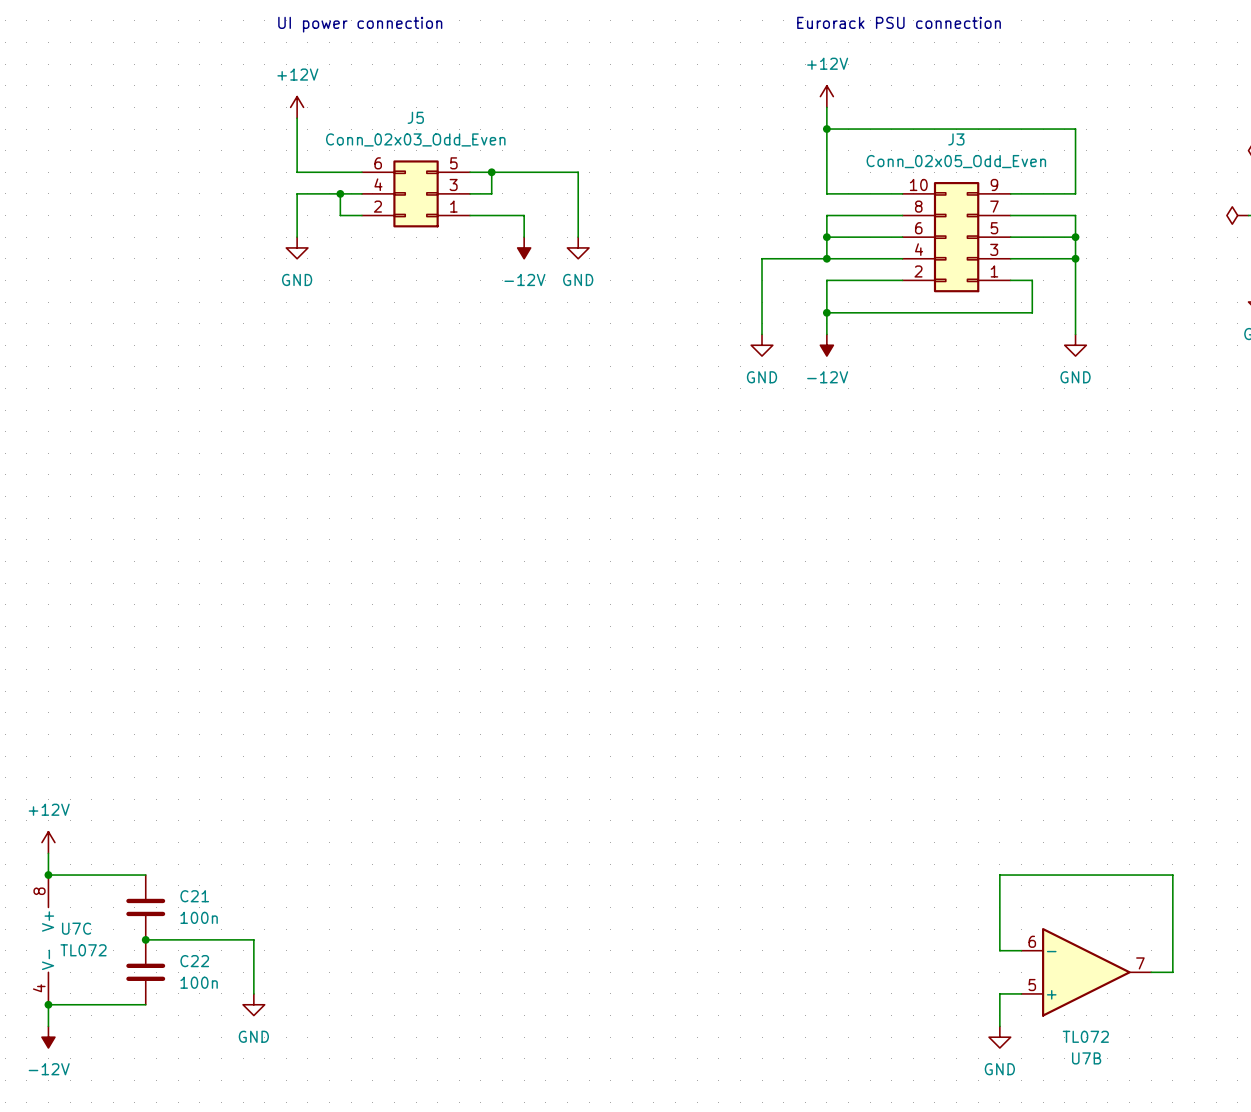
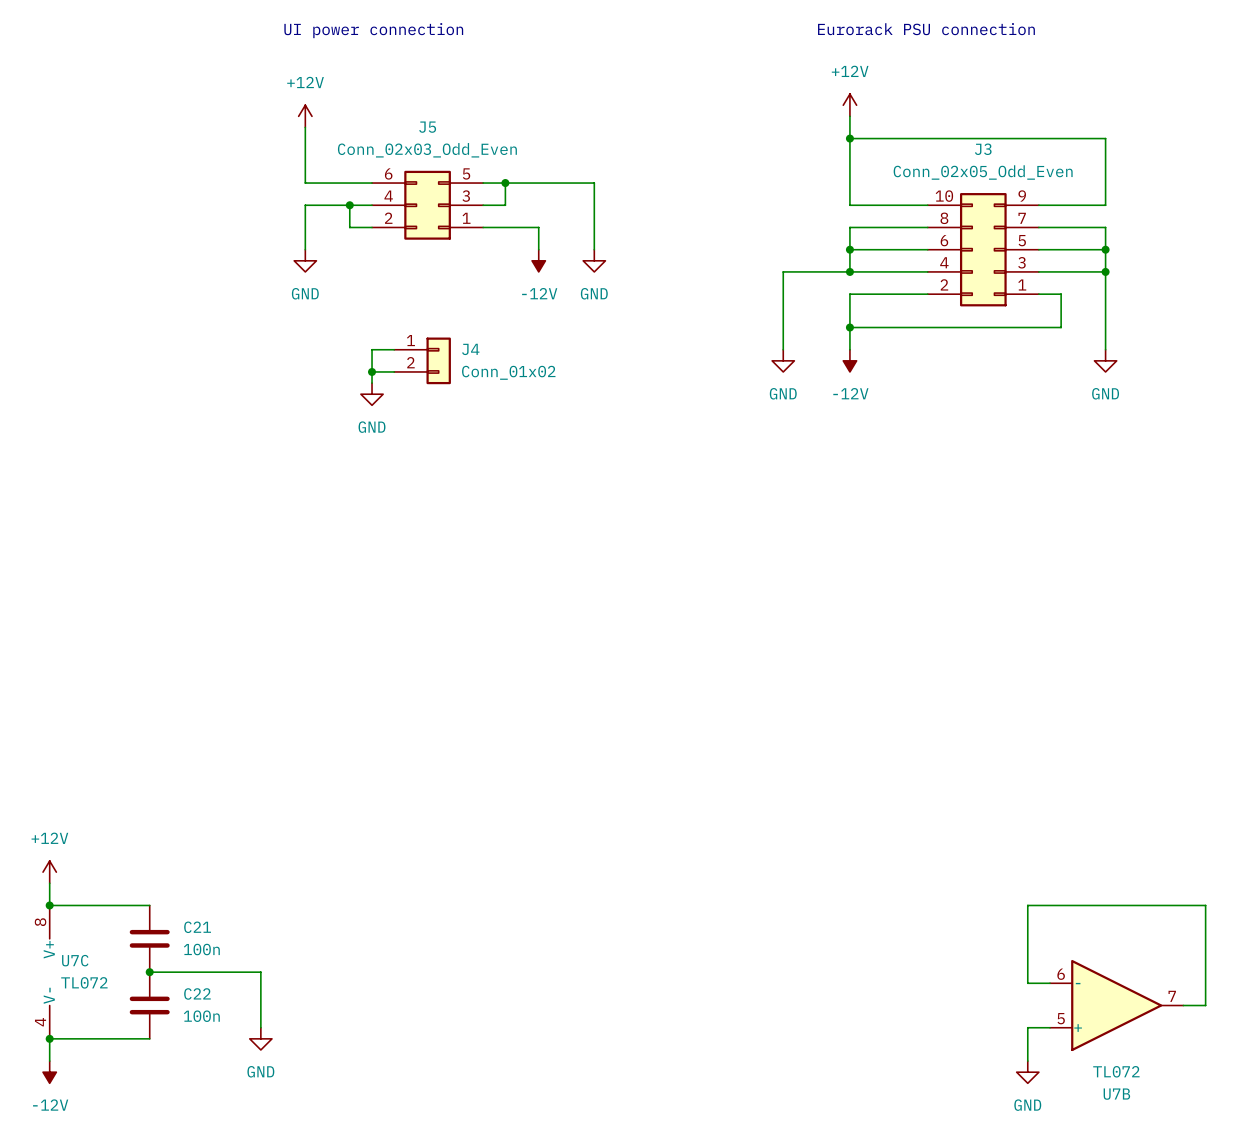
wire: none -> (394, 349) (372, 349) (372, 383)
J4: none -> Conn_01x02 (422, 360)
wire: none -> (372, 371) (394, 371)
junction: none -> (372, 371)
power symbol: none -> GND (372, 394)

